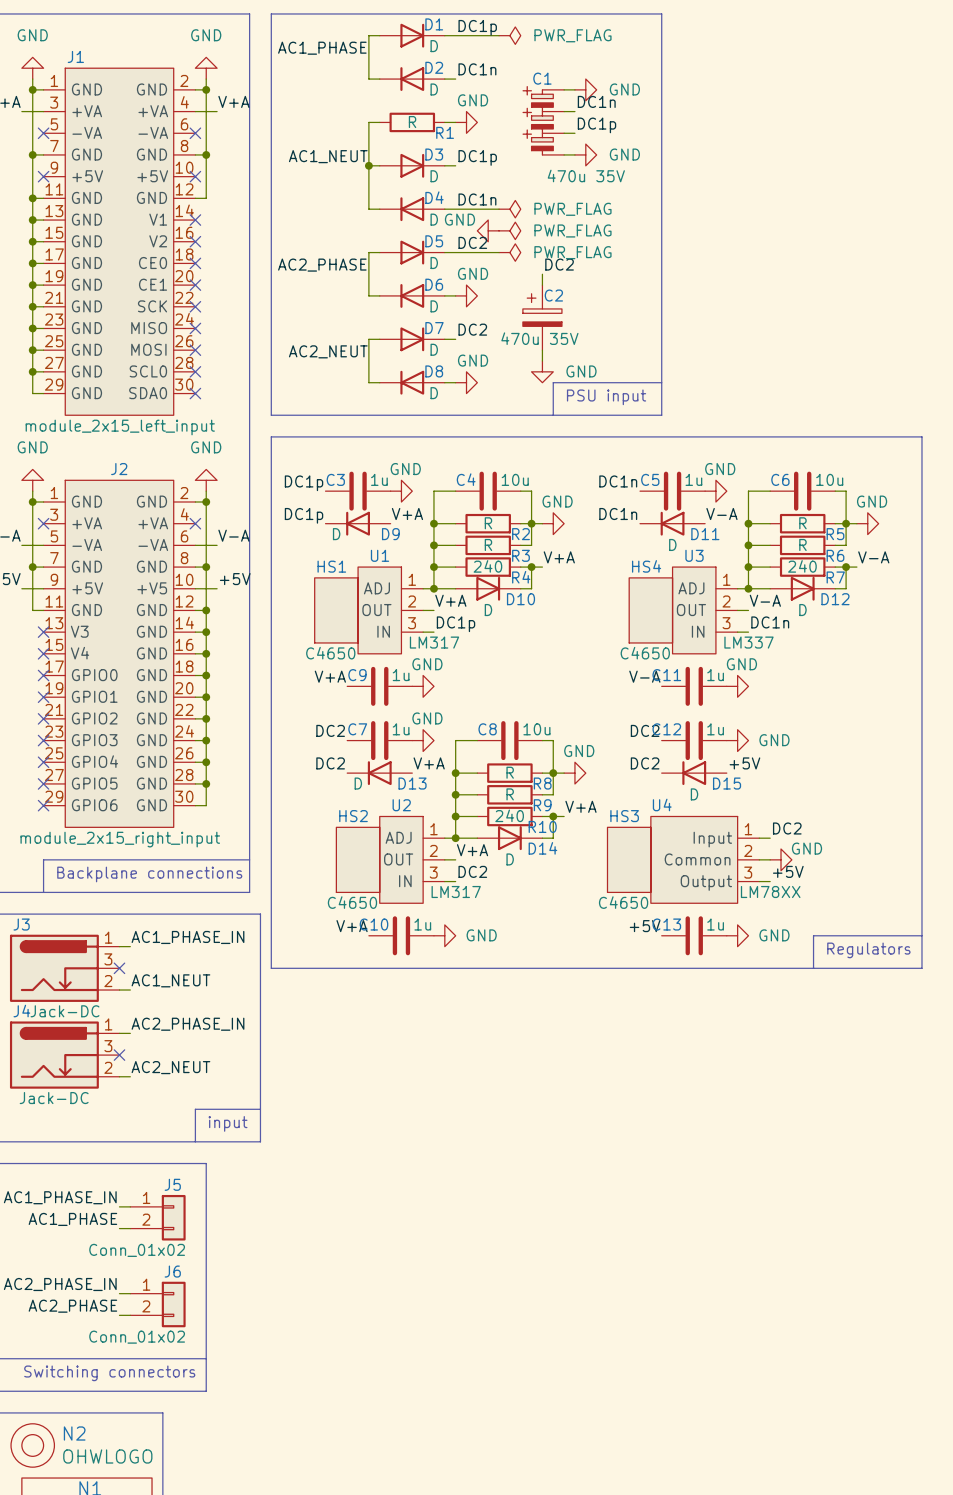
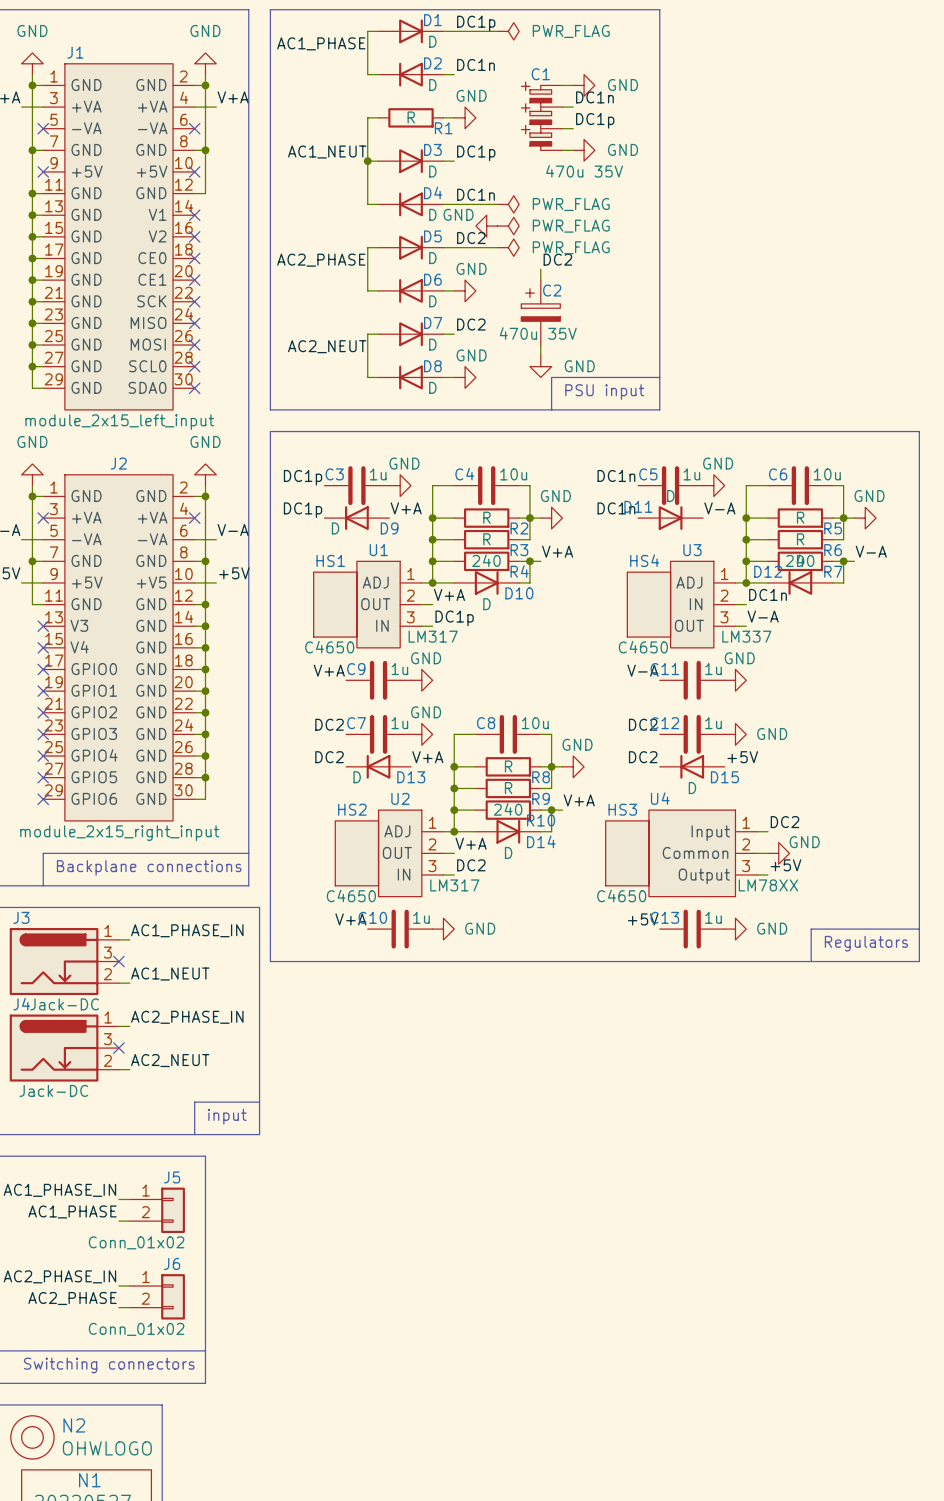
D11 rotation: 0° (672, 523) -> 180° (670, 518)
D12 rotation: 0° (802, 588) -> 180° (800, 582)
label: V-A (765, 600) -> DC1n (768, 594)
U3 pin name: OUT (691, 610) -> IN (696, 604)
label: DC1n (770, 622) -> V-A (763, 616)
U3 pin name: IN (698, 631) -> OUT (689, 625)

